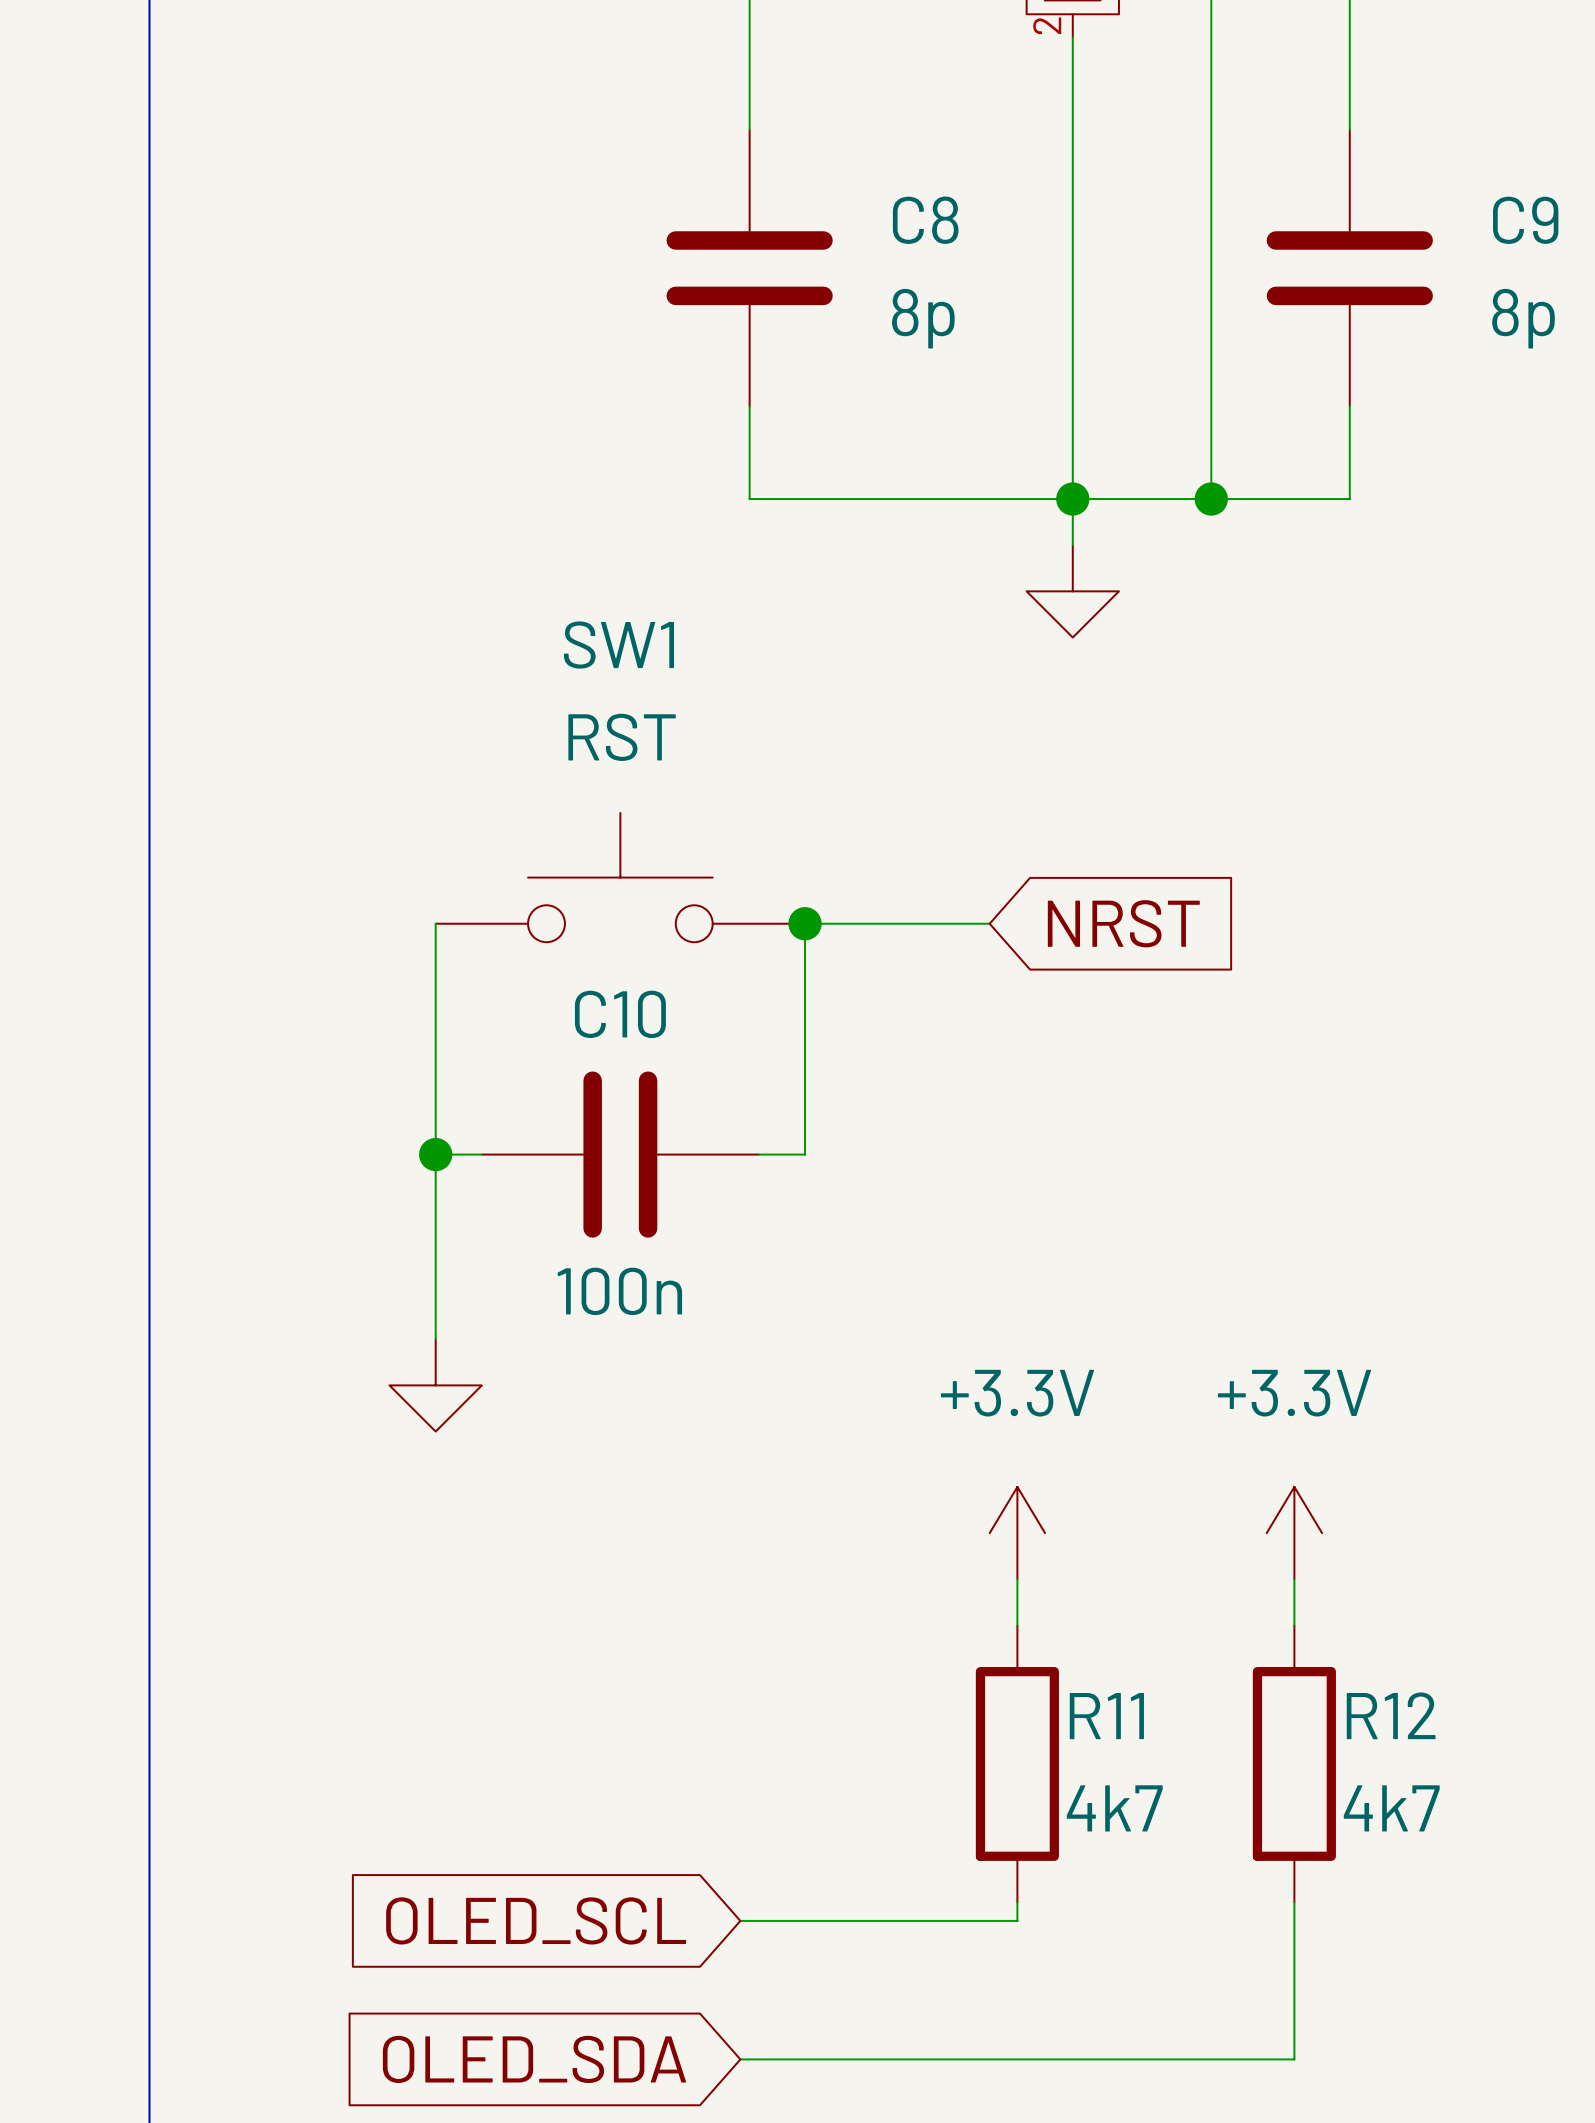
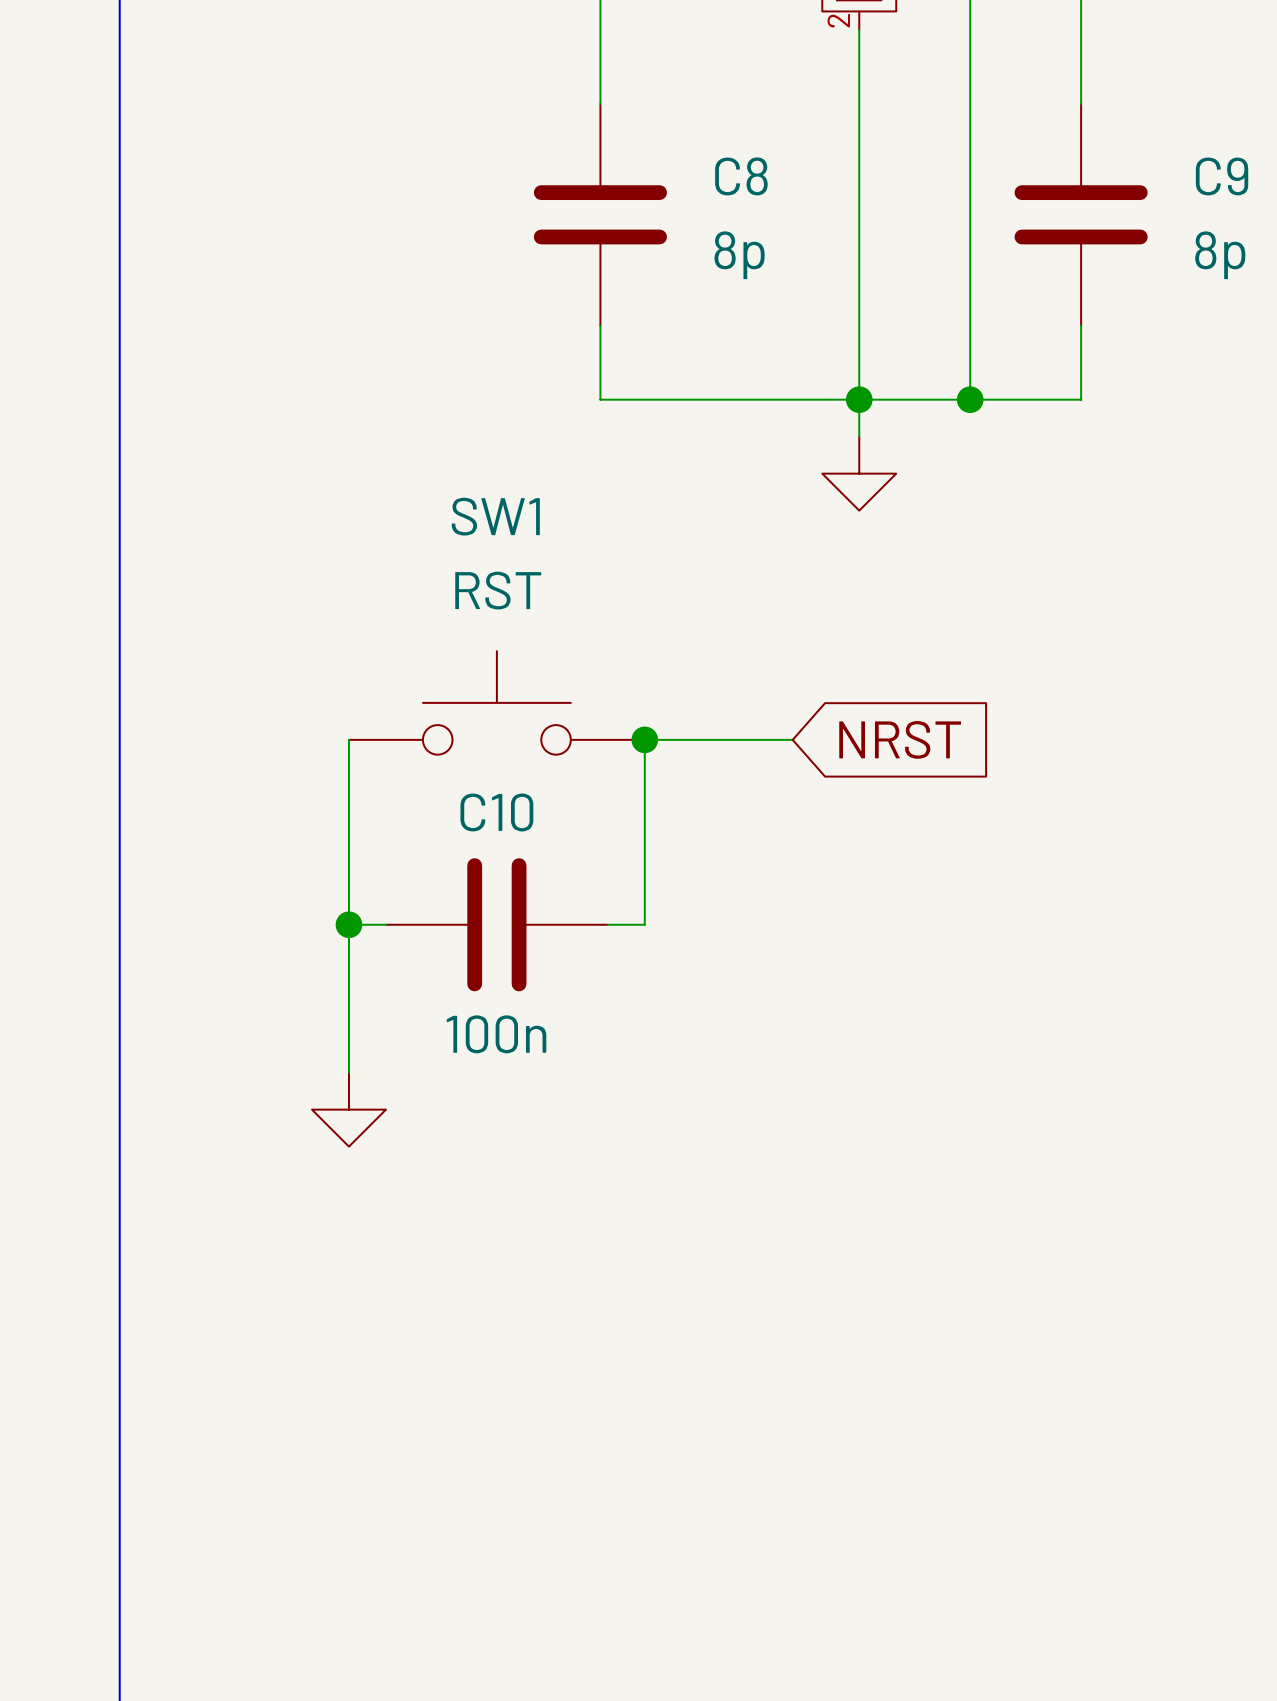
power symbol: +3.3V (1017, 1533) -> none
power symbol: +3.3V (1294, 1533) -> none
wire: (1017, 1579) (1017, 1625) -> none
wire: (1294, 1579) (1294, 1625) -> none
R11: 4k7 (1017, 1763) -> none
R12: 4k7 (1294, 1763) -> none
wire: (1017, 1902) (1017, 1920) (740, 1920) -> none
wire: (1294, 1902) (1294, 2059) (740, 2059) -> none
global label: OLED_SCL (536, 1920) -> none
global label: OLED_SDA (534, 2059) -> none

